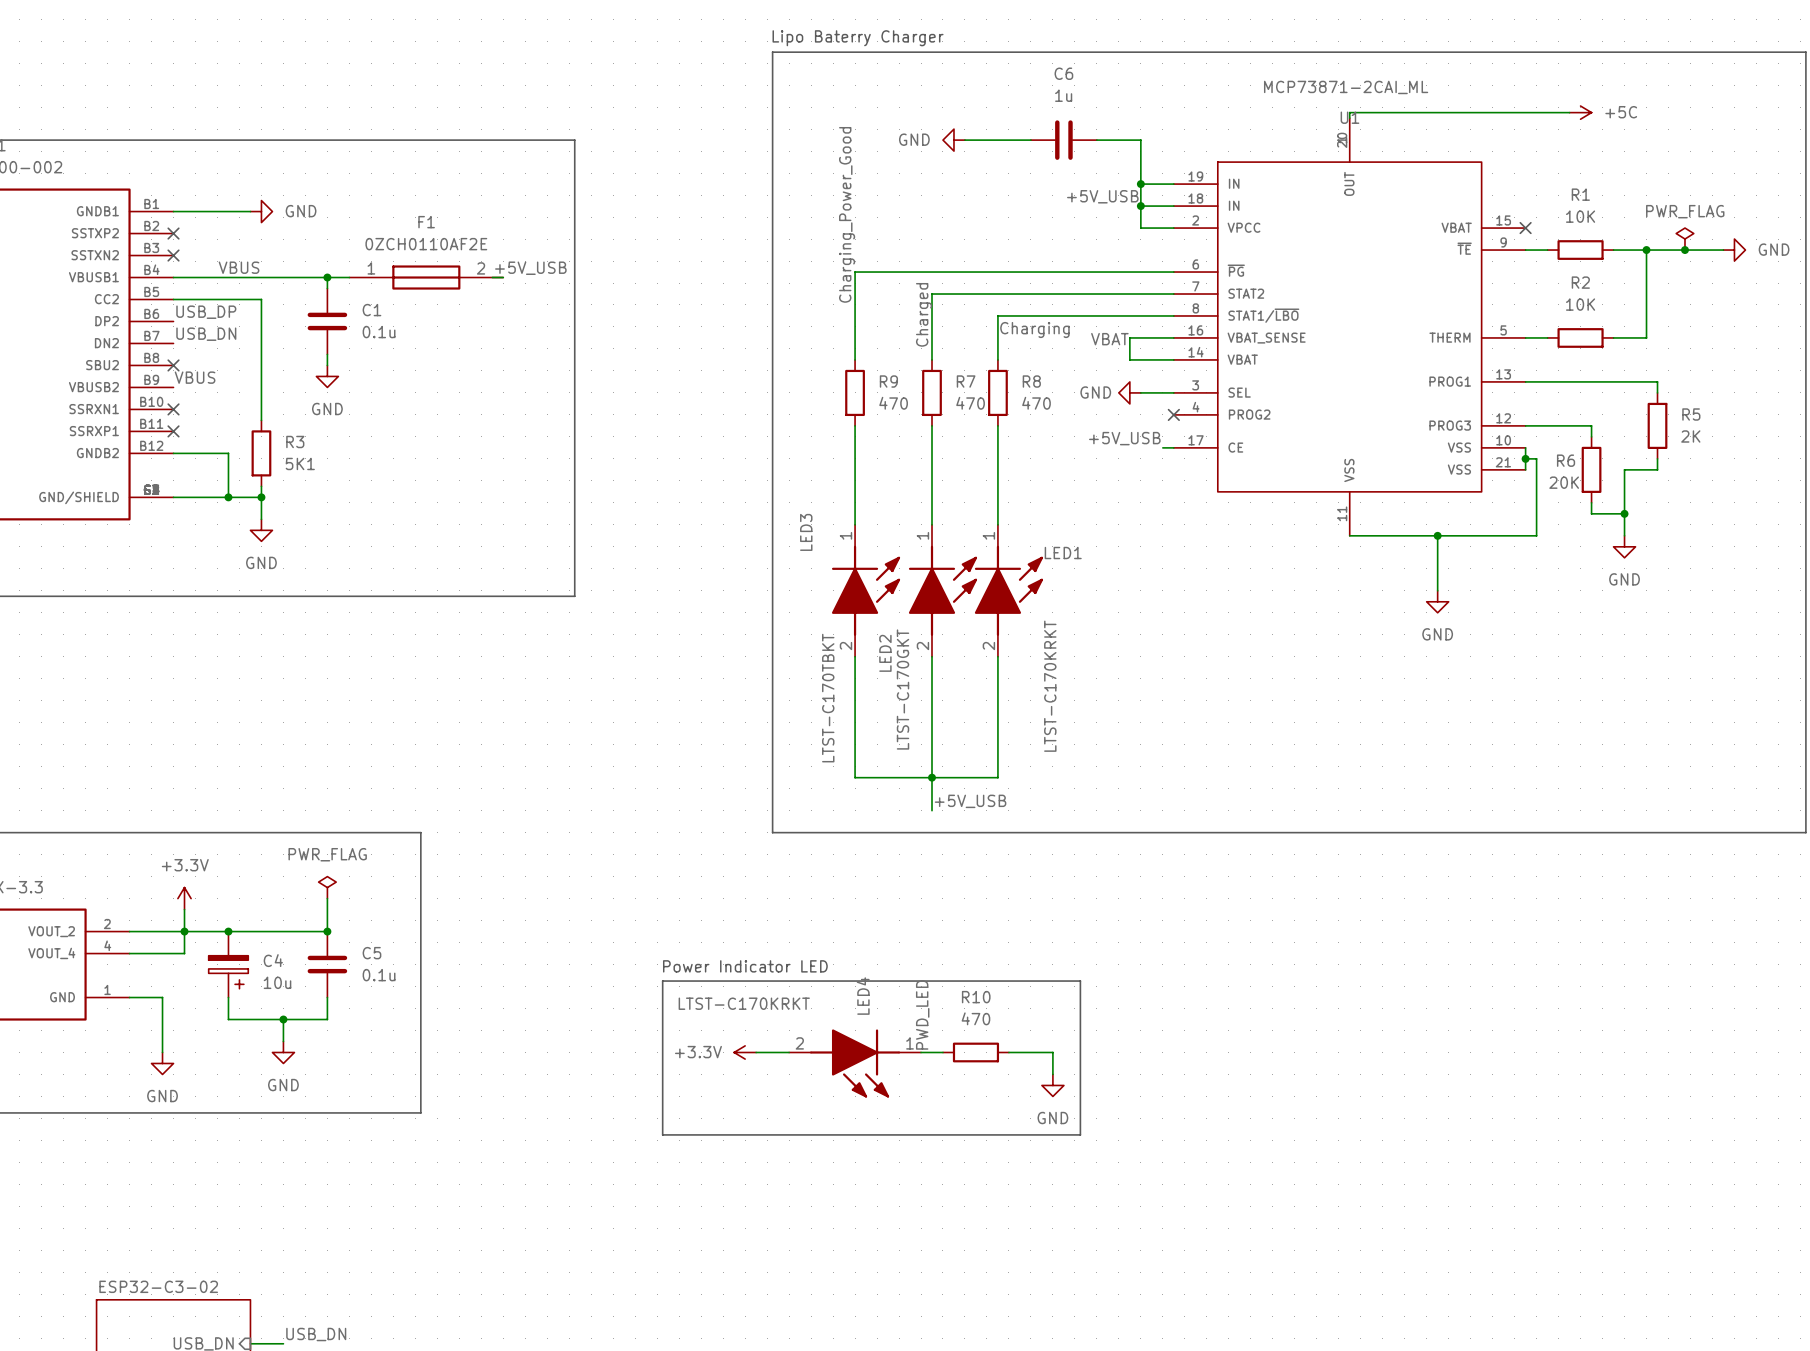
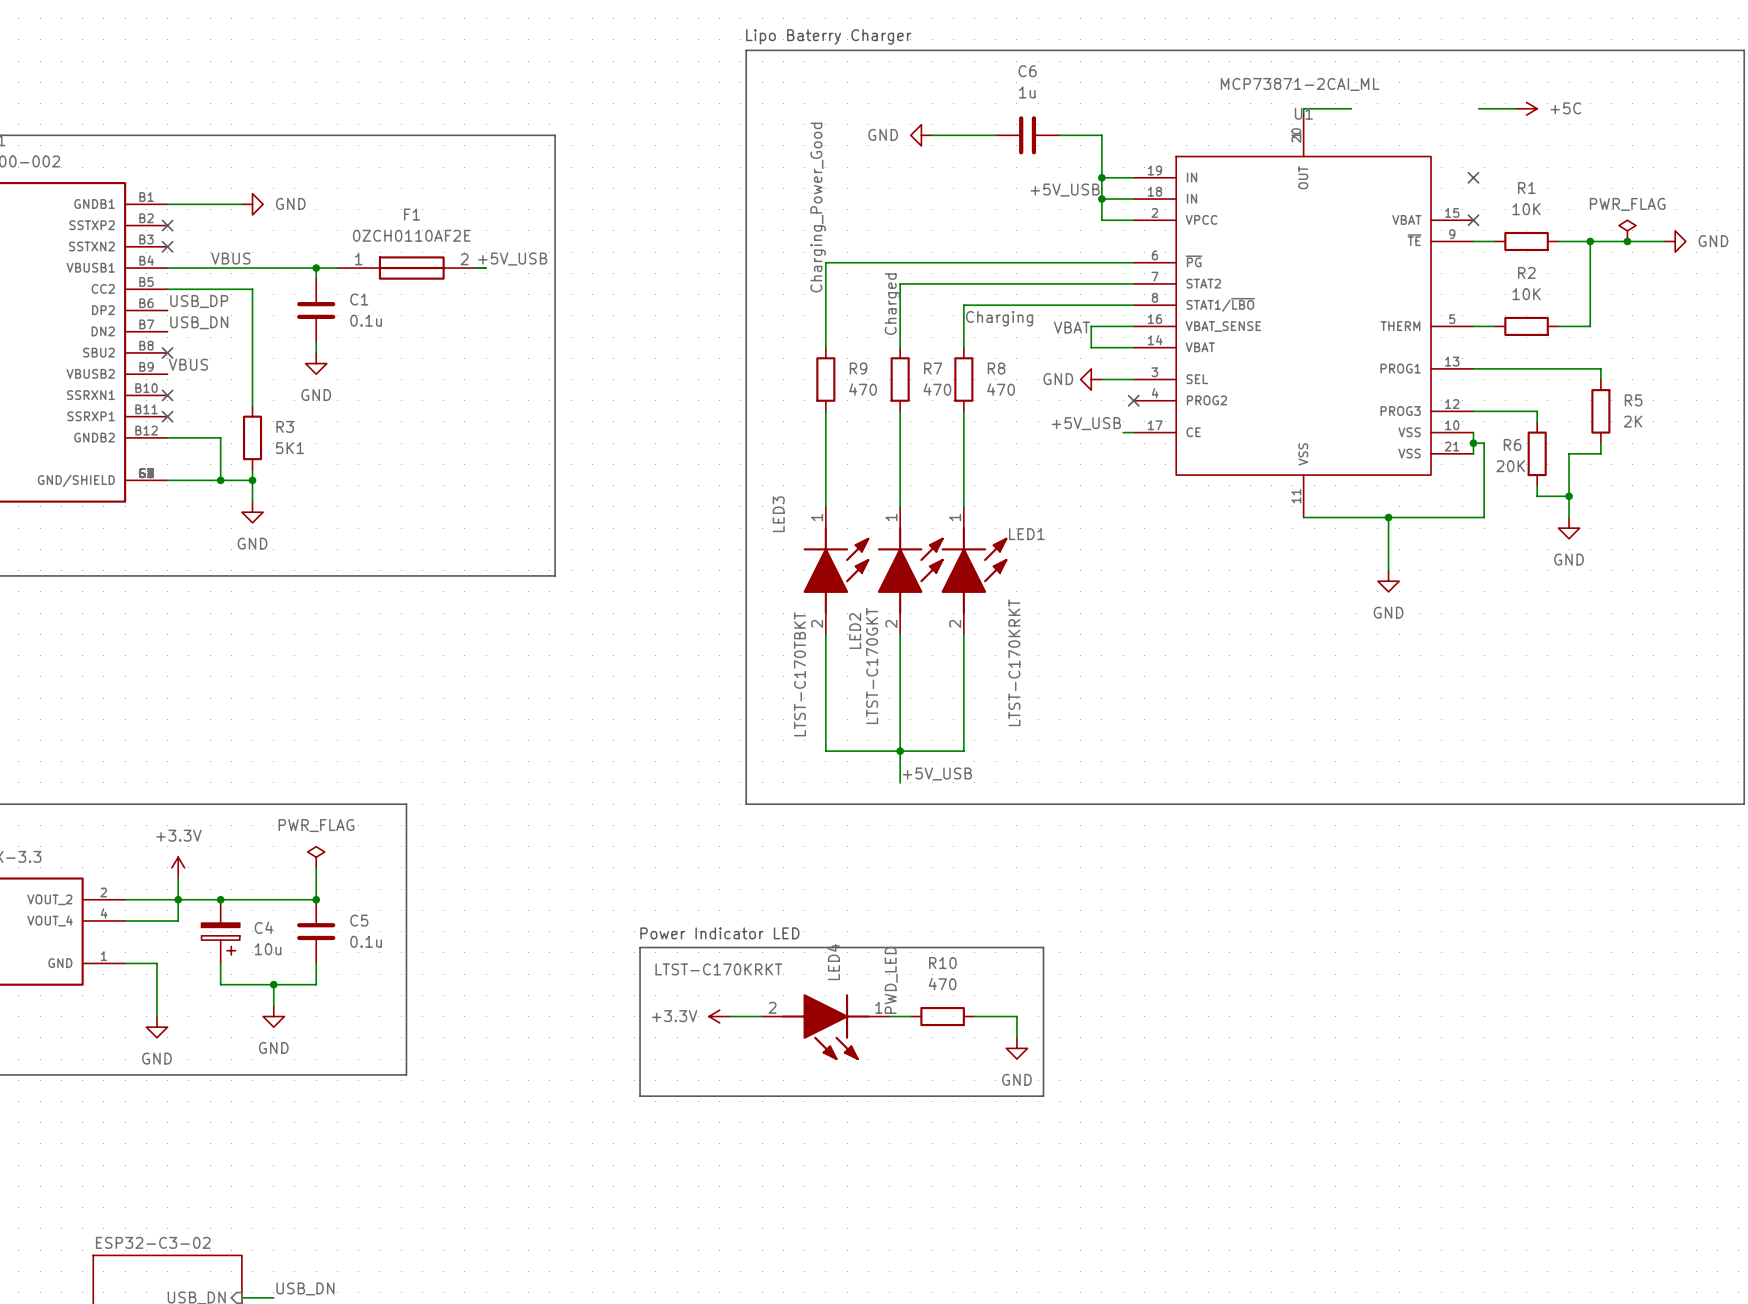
wire: (1399, 112) (1531, 112) -> none
no-connect mark: none -> (1473, 177)

